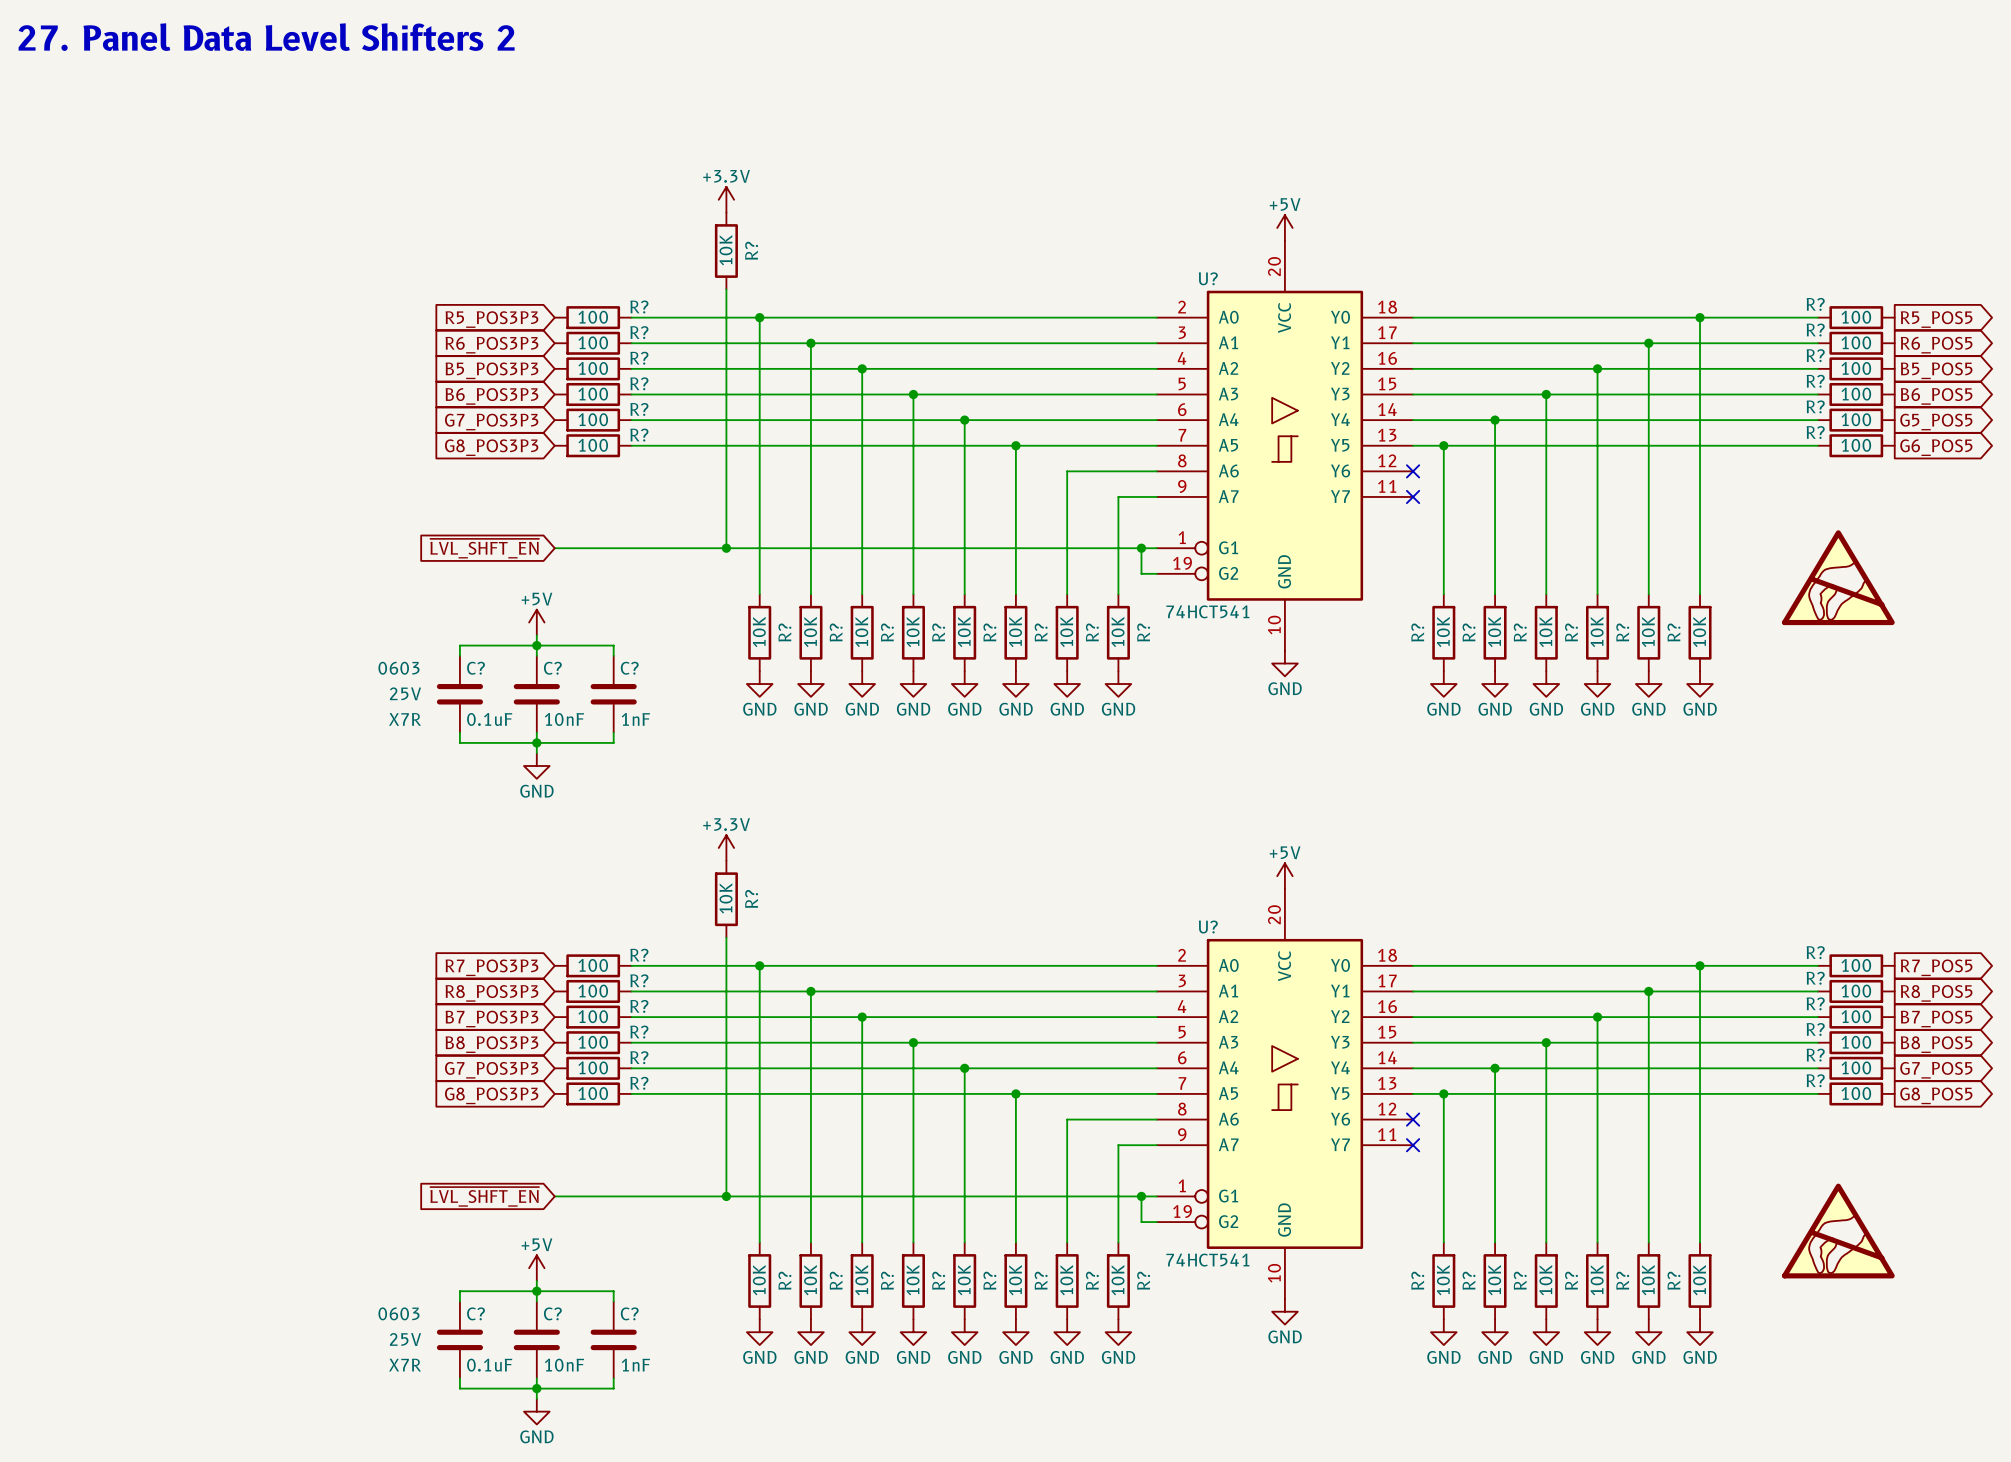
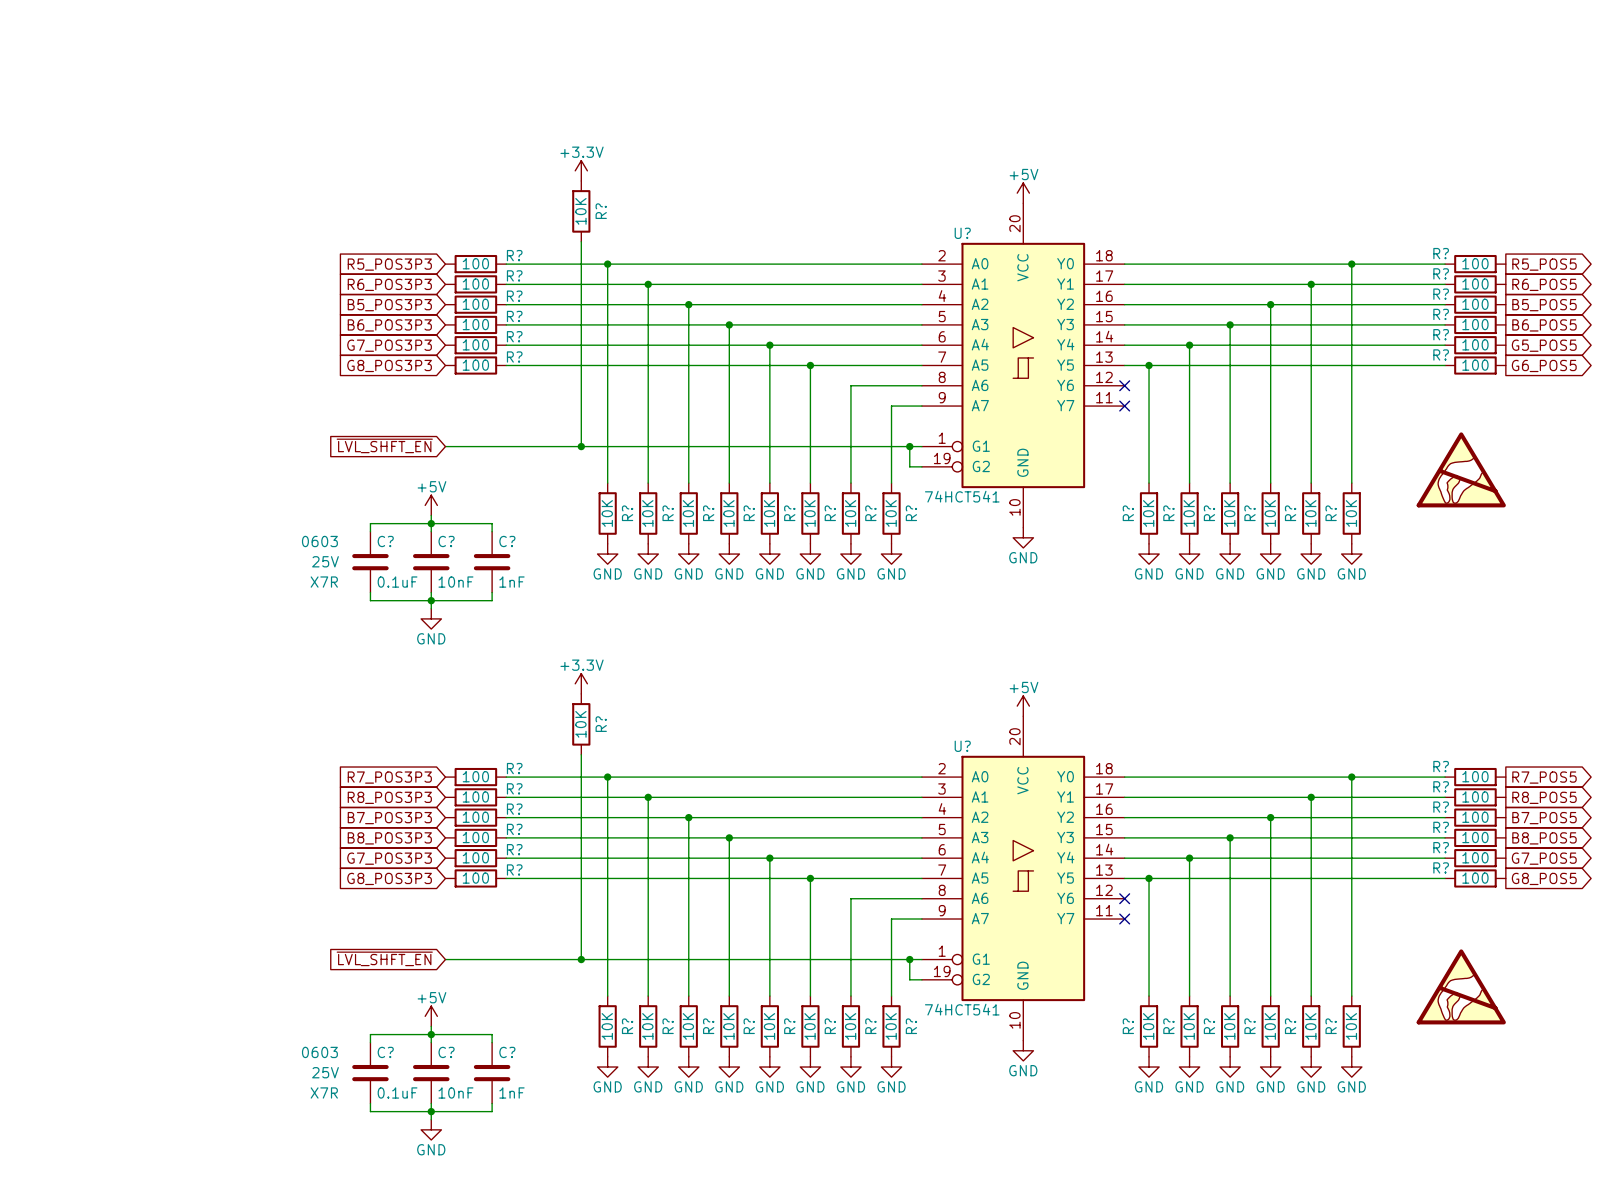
text: 27. Panel Data Level Shifters 2 (266, 37) -> none

